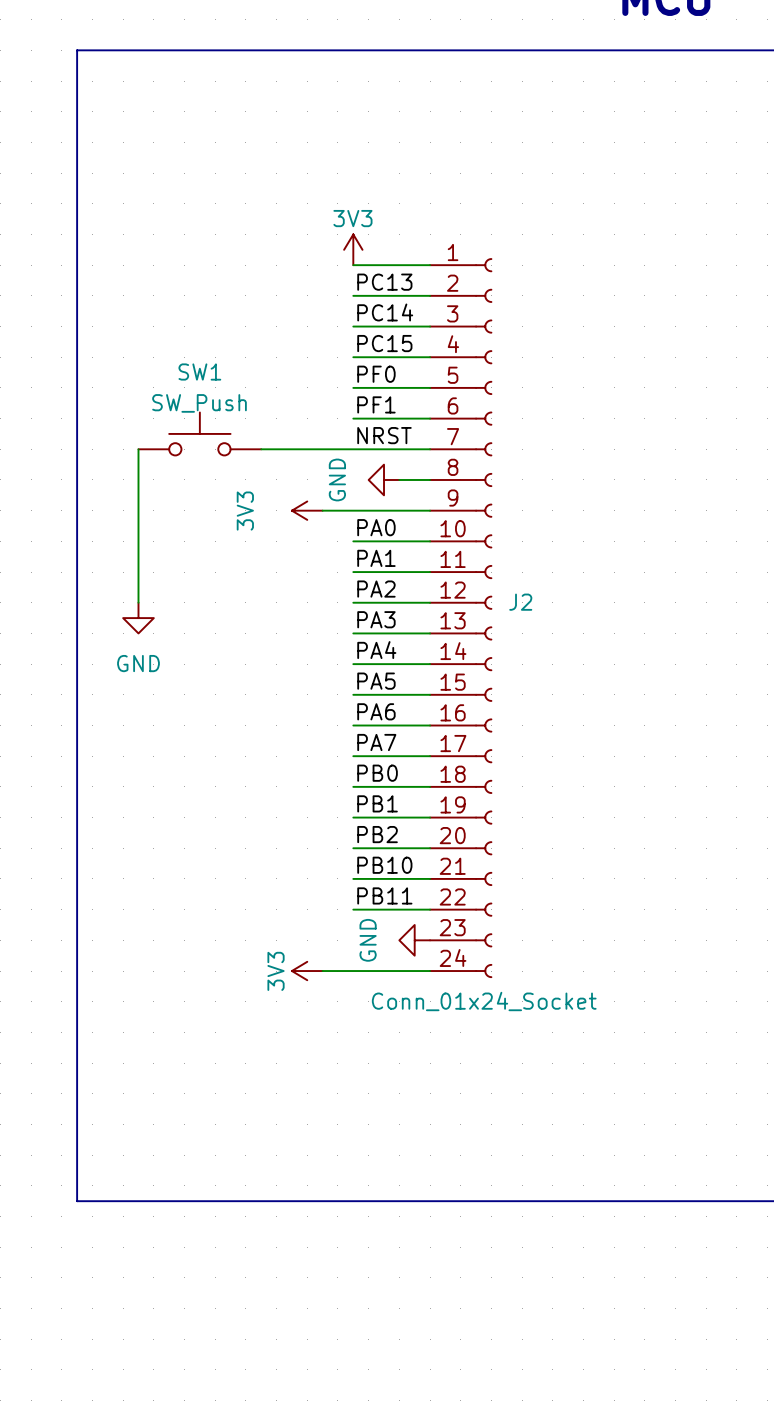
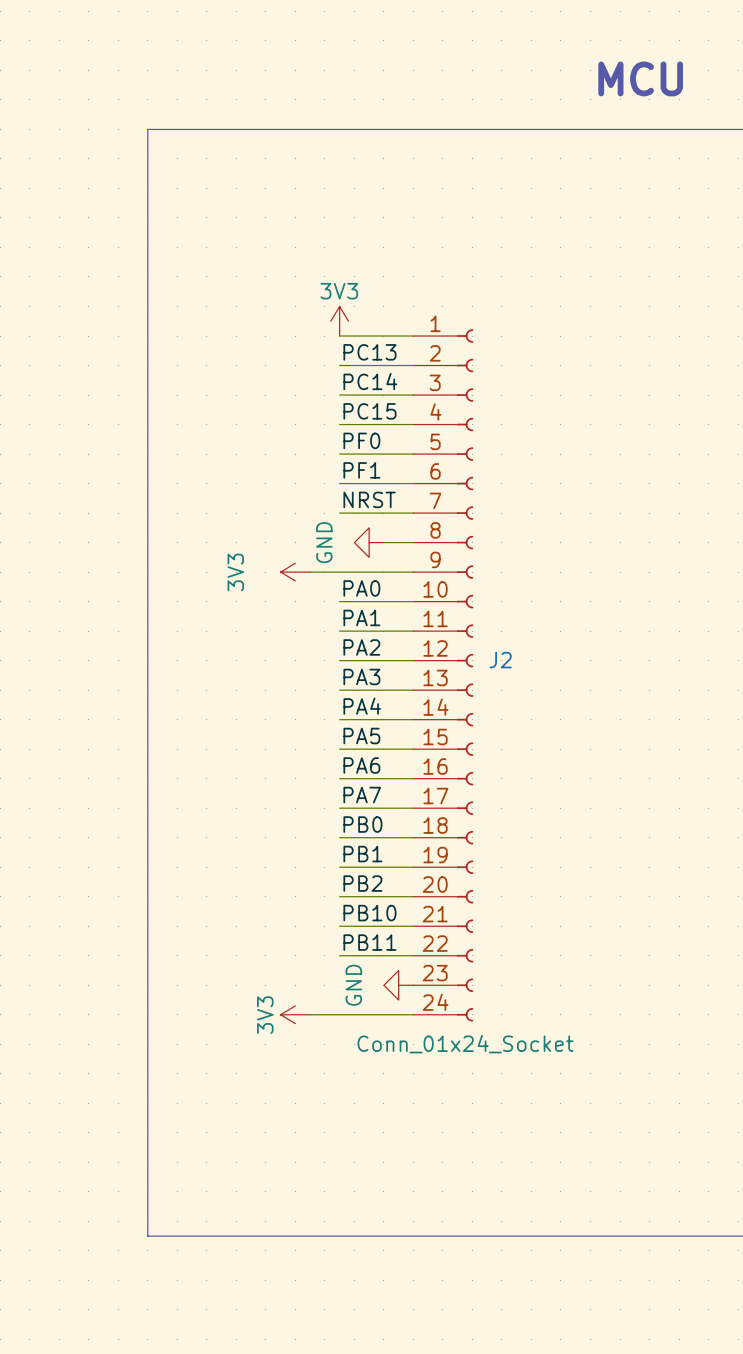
line: (153, 50) (77, 50) (77, 1201) (153, 1201) -> (147, 129) (147, 1236)
SW1: SW_Push (199, 433) -> none
wire: (138, 449) (138, 602) -> none
wire: (261, 449) (353, 449) -> none
power symbol: GND (138, 618) -> none

